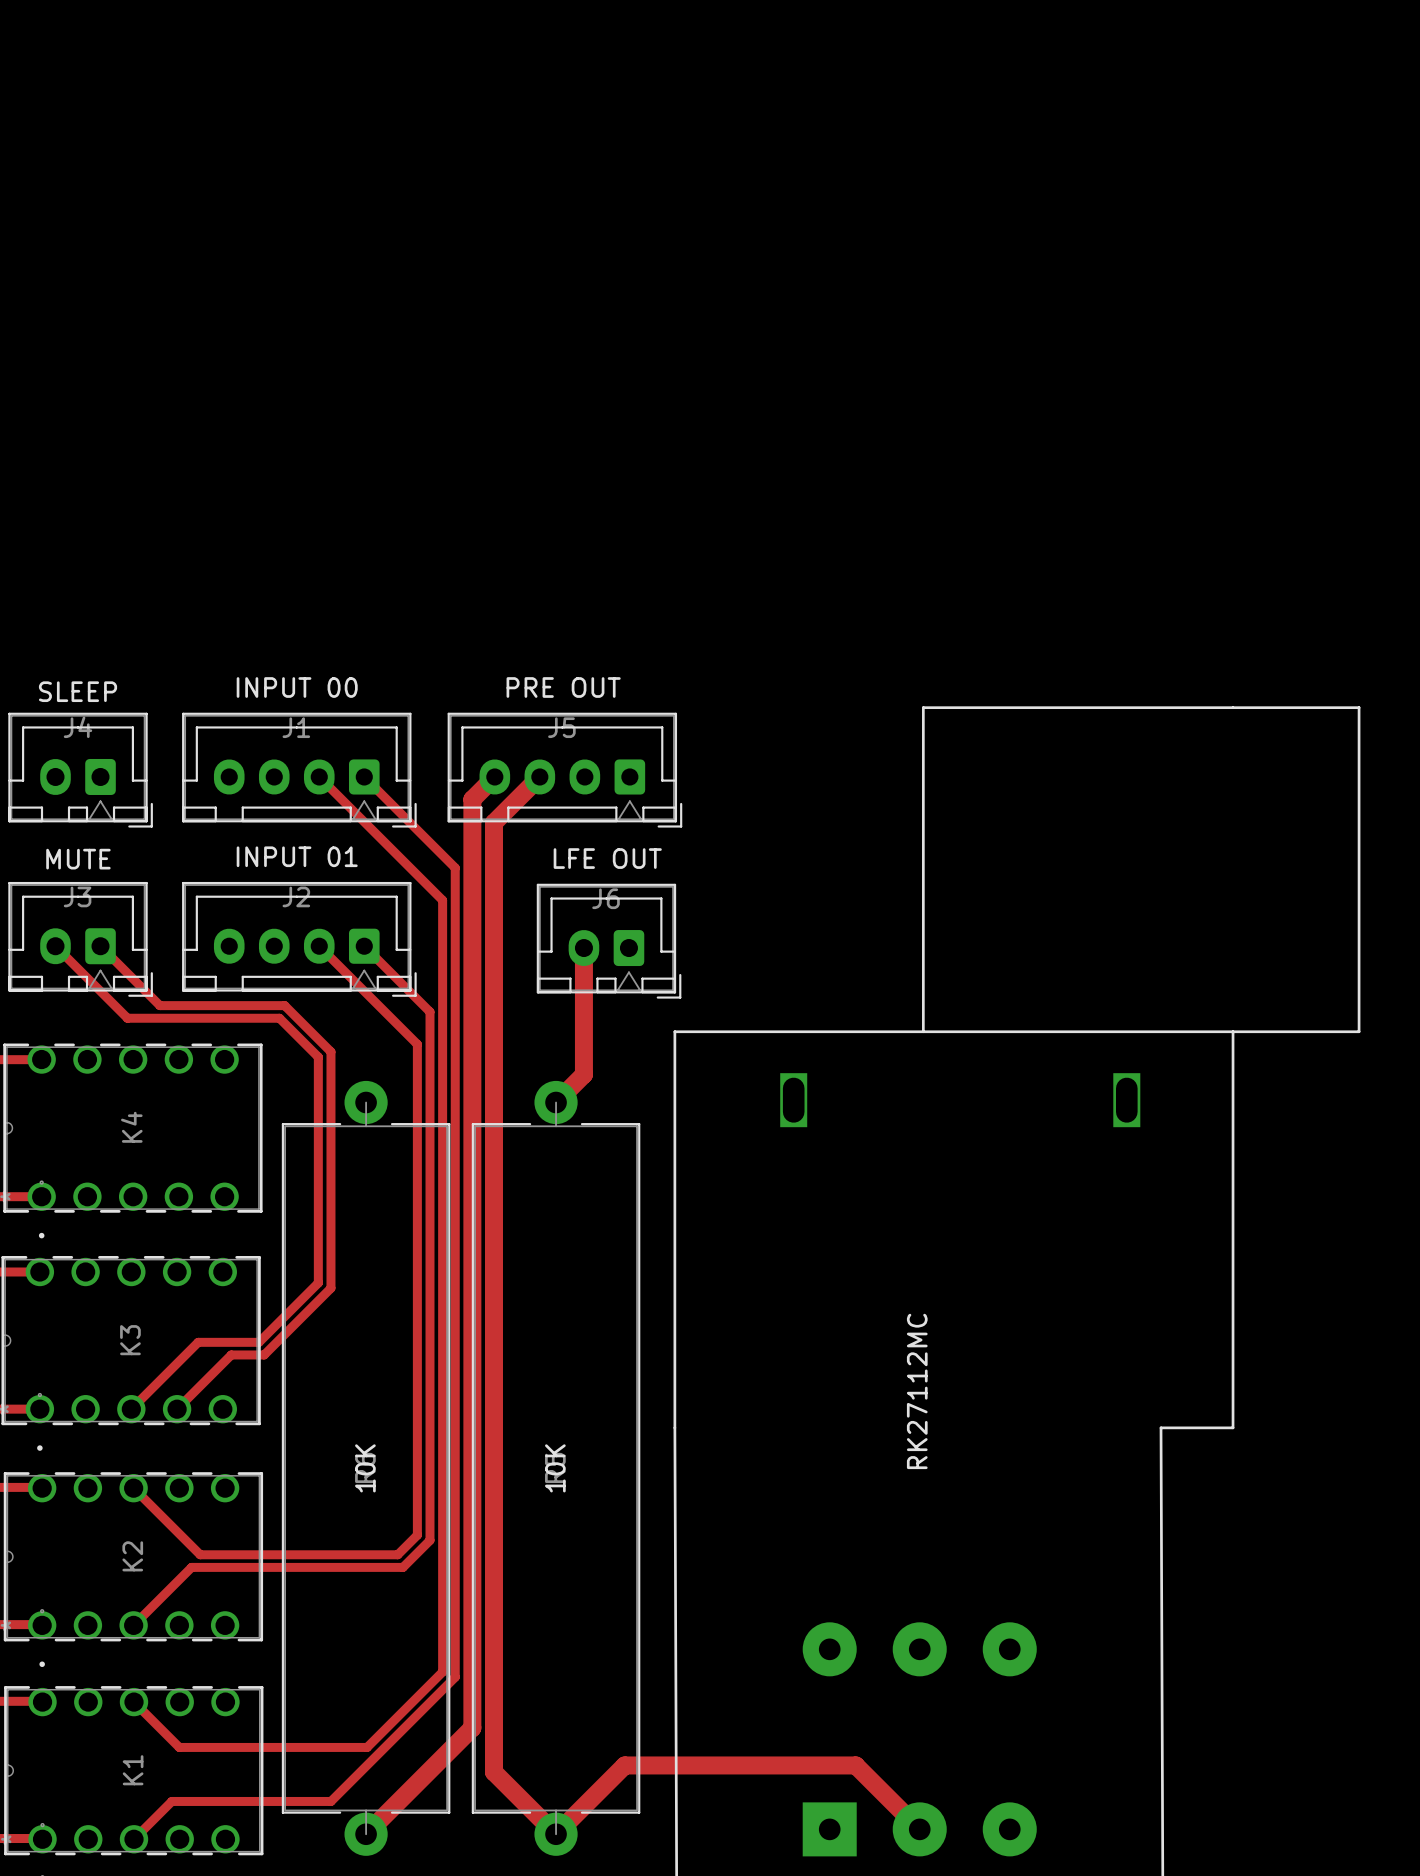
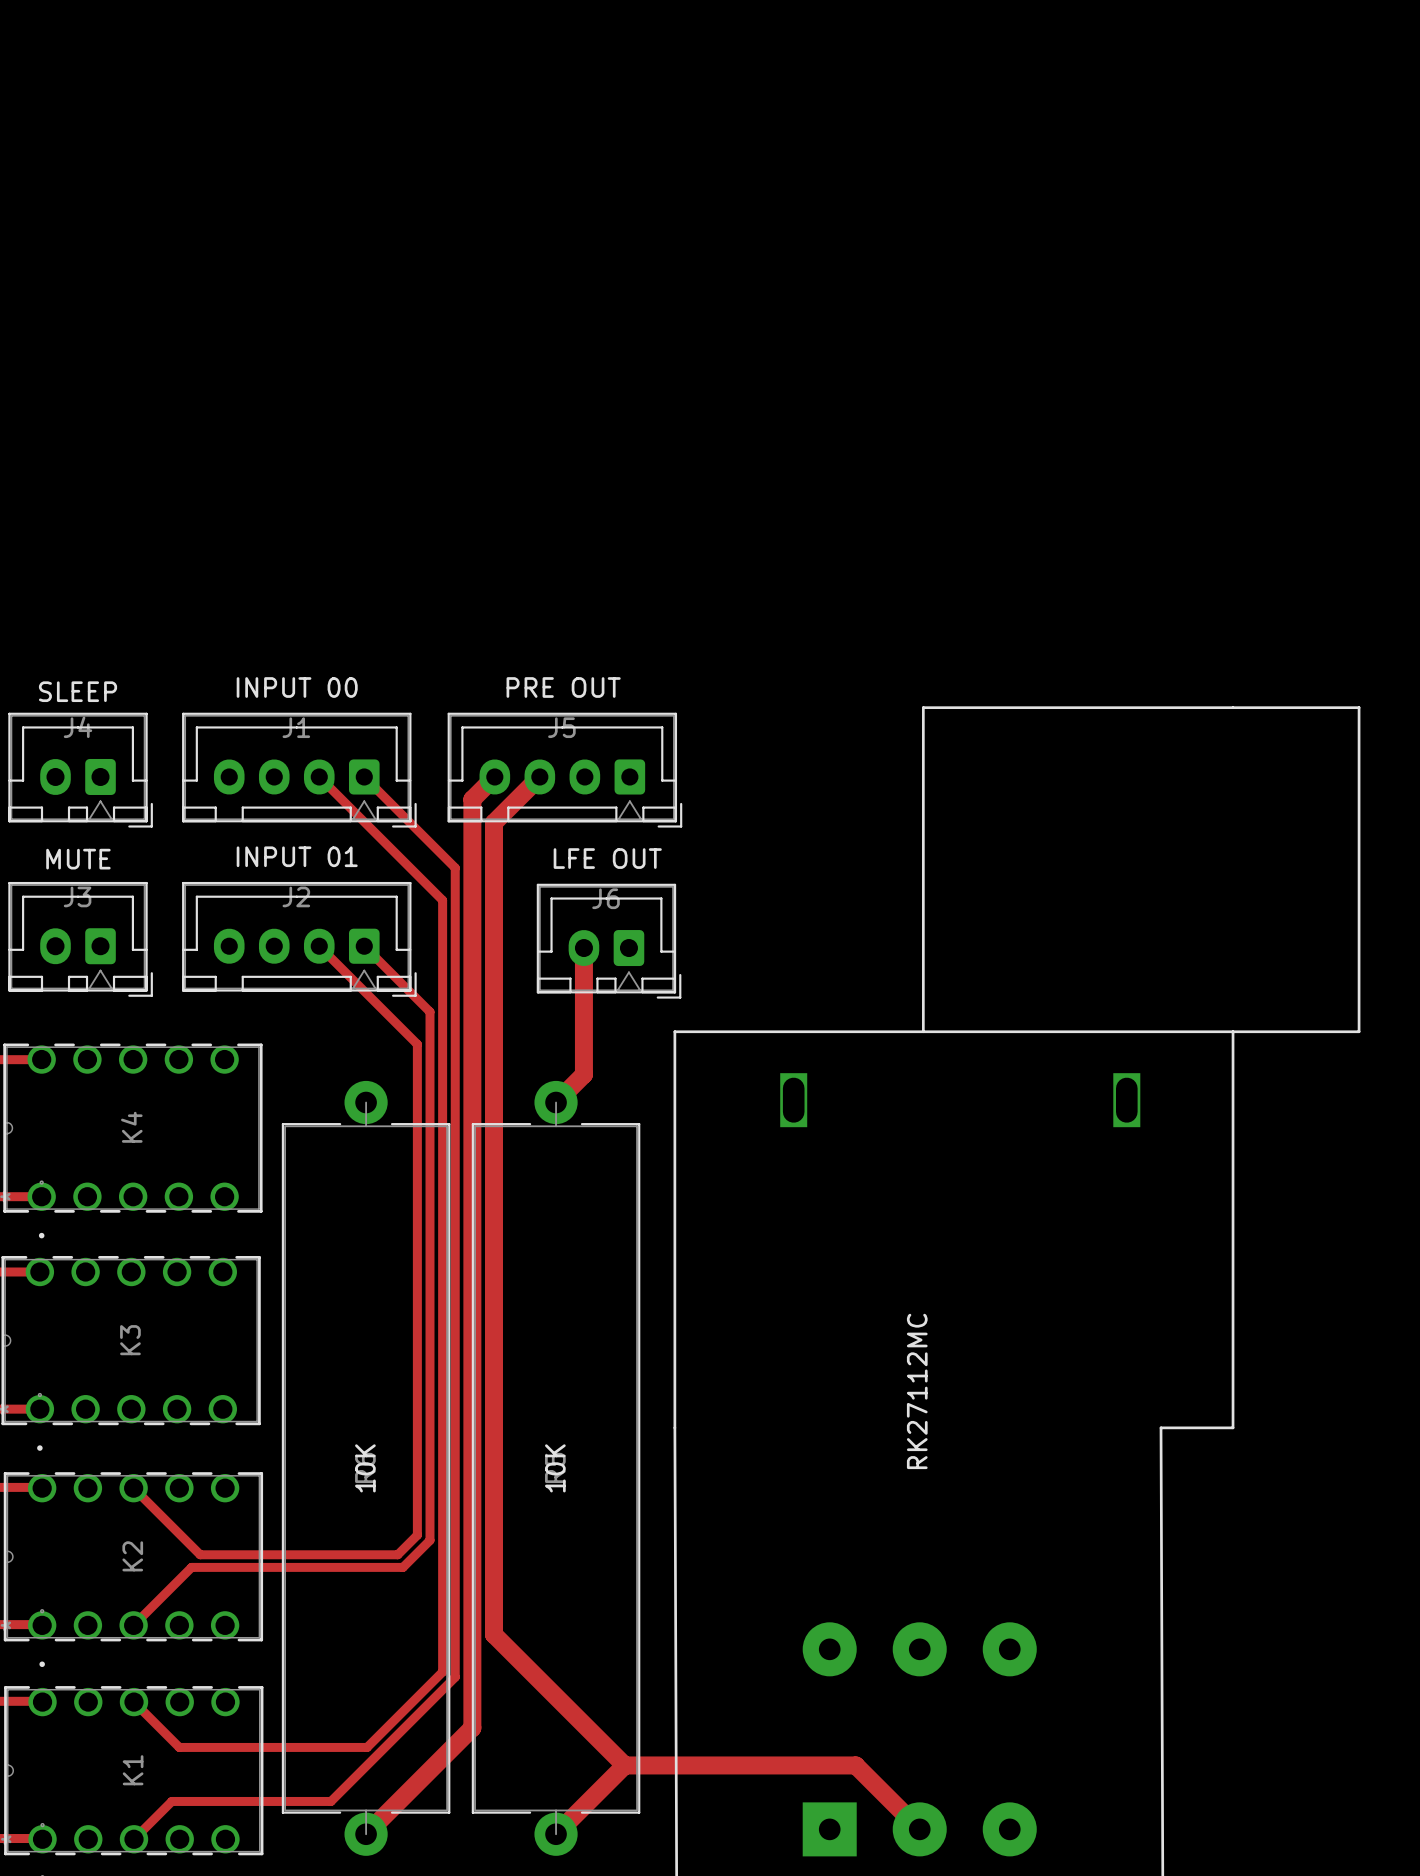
track: (55, 946) (127, 1018) (279, 1018) (318, 1057) (318, 1282) (258, 1342) (198, 1342) (131, 1409) -> none
track: (100, 946) (159, 1005) (284, 1005) (330, 1051) (330, 1288) (264, 1354) (231, 1354) (177, 1409) -> none
track: (493, 1634) (493, 1772) (556, 1834) -> (493, 1634) (624, 1765)

